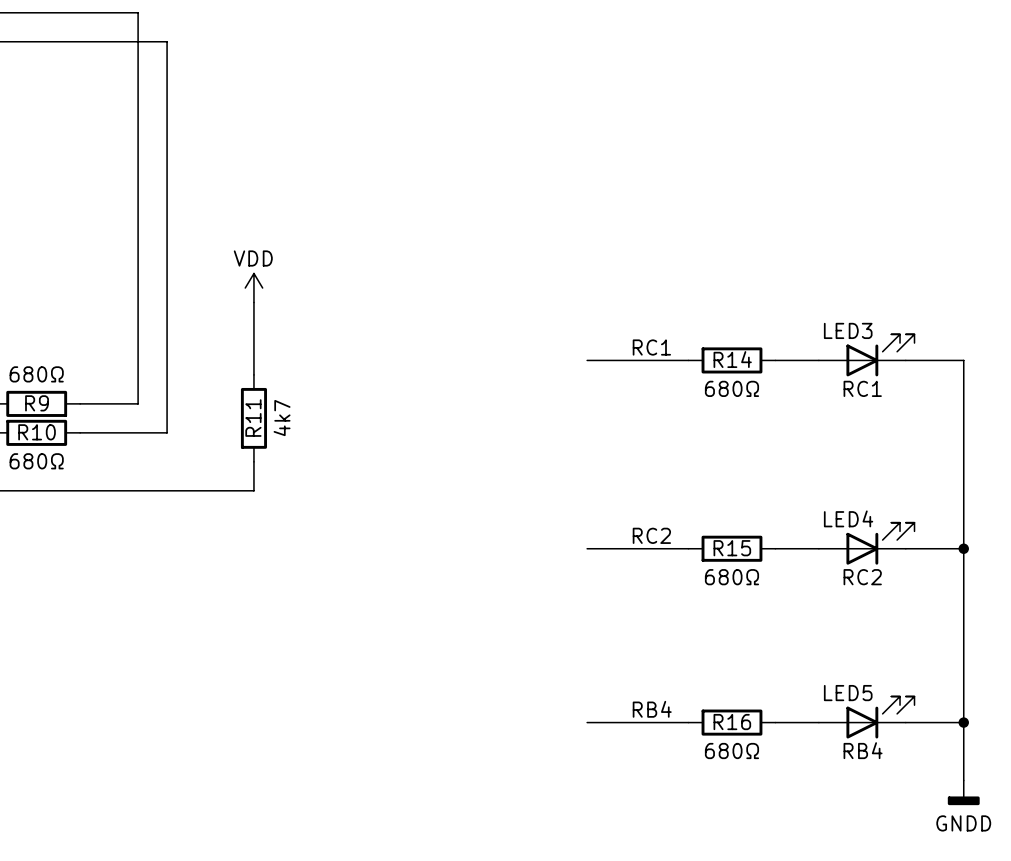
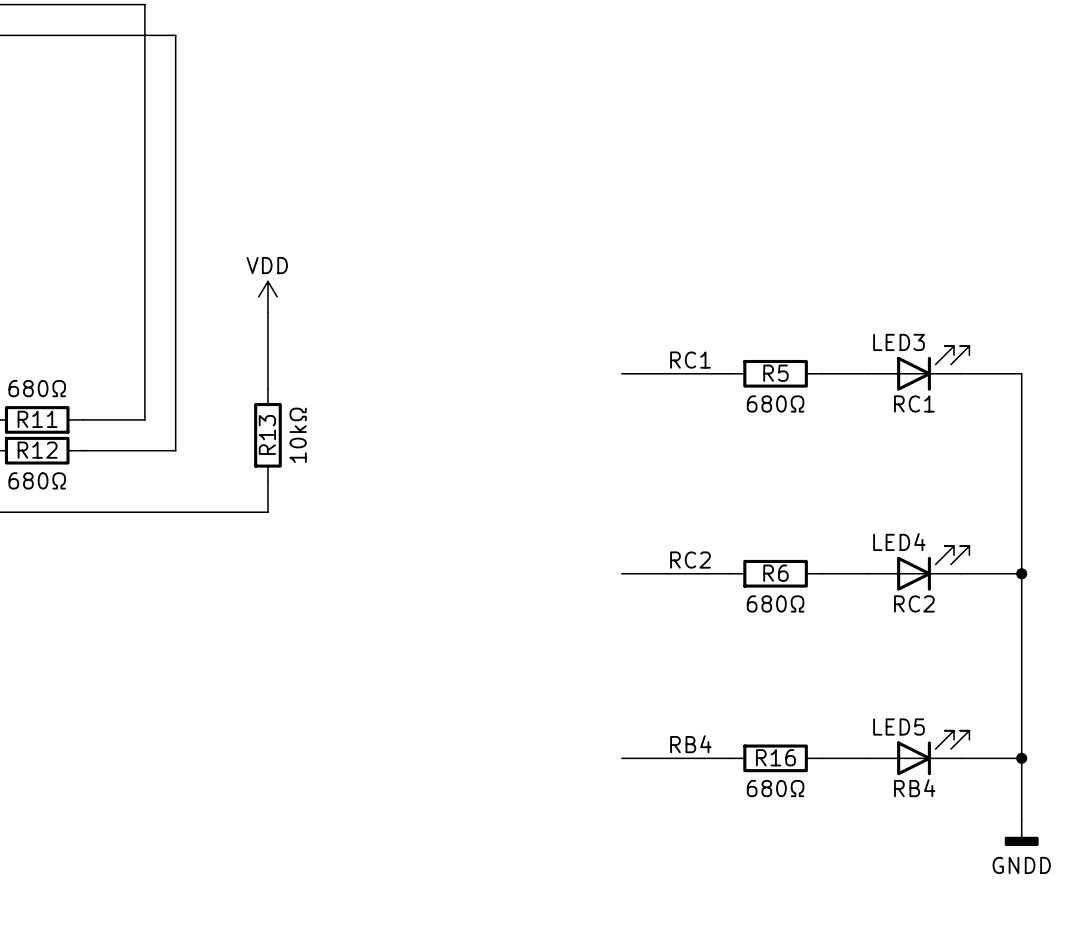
R14 name: R14 (732, 359) -> R5 (775, 373)
R9 name: R9 (37, 403) -> R11 (37, 419)
R11 name: R11 (253, 418) -> R13 (267, 434)
R11 value: 4k7 (282, 418) -> 10kΩ (298, 435)
R10 name: R10 (37, 432) -> R12 (37, 450)
R15 name: R15 (732, 548) -> R6 (775, 573)

